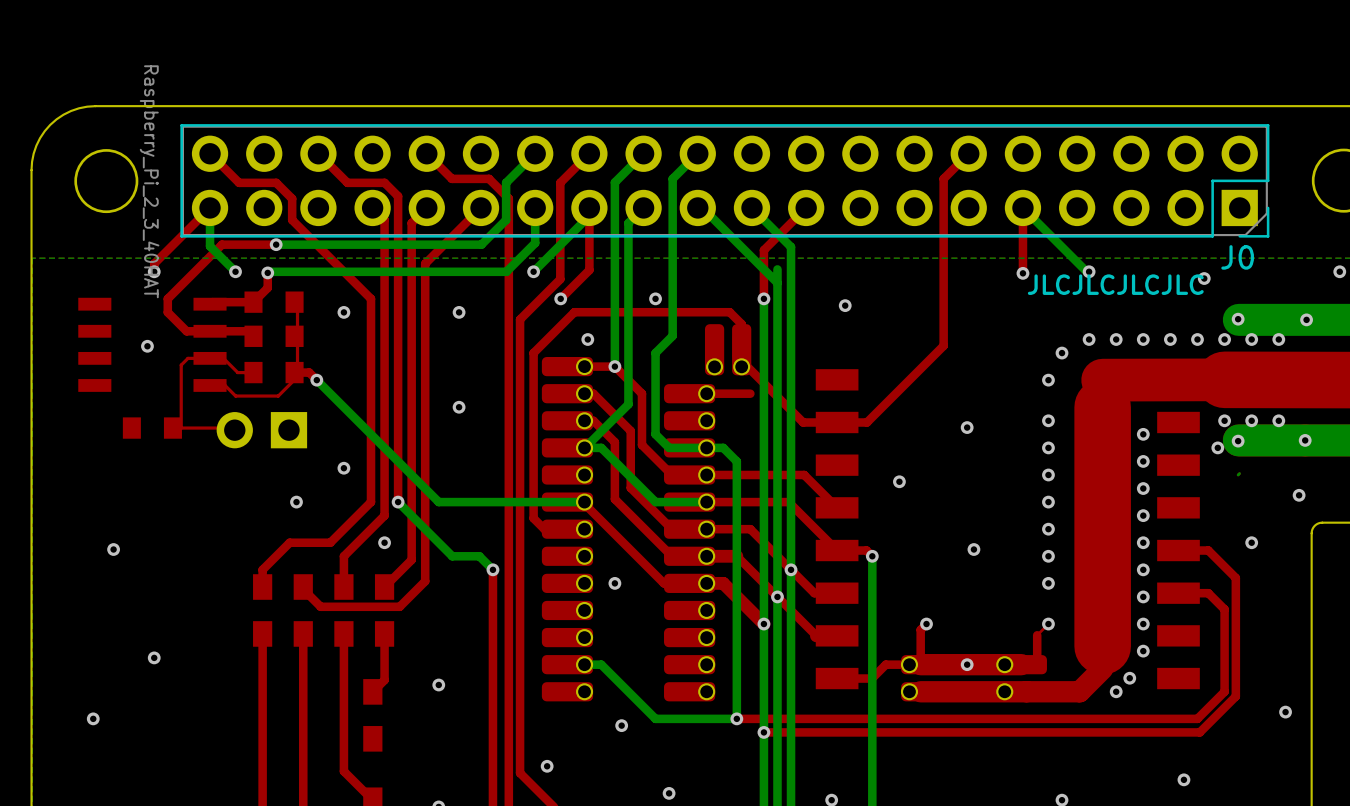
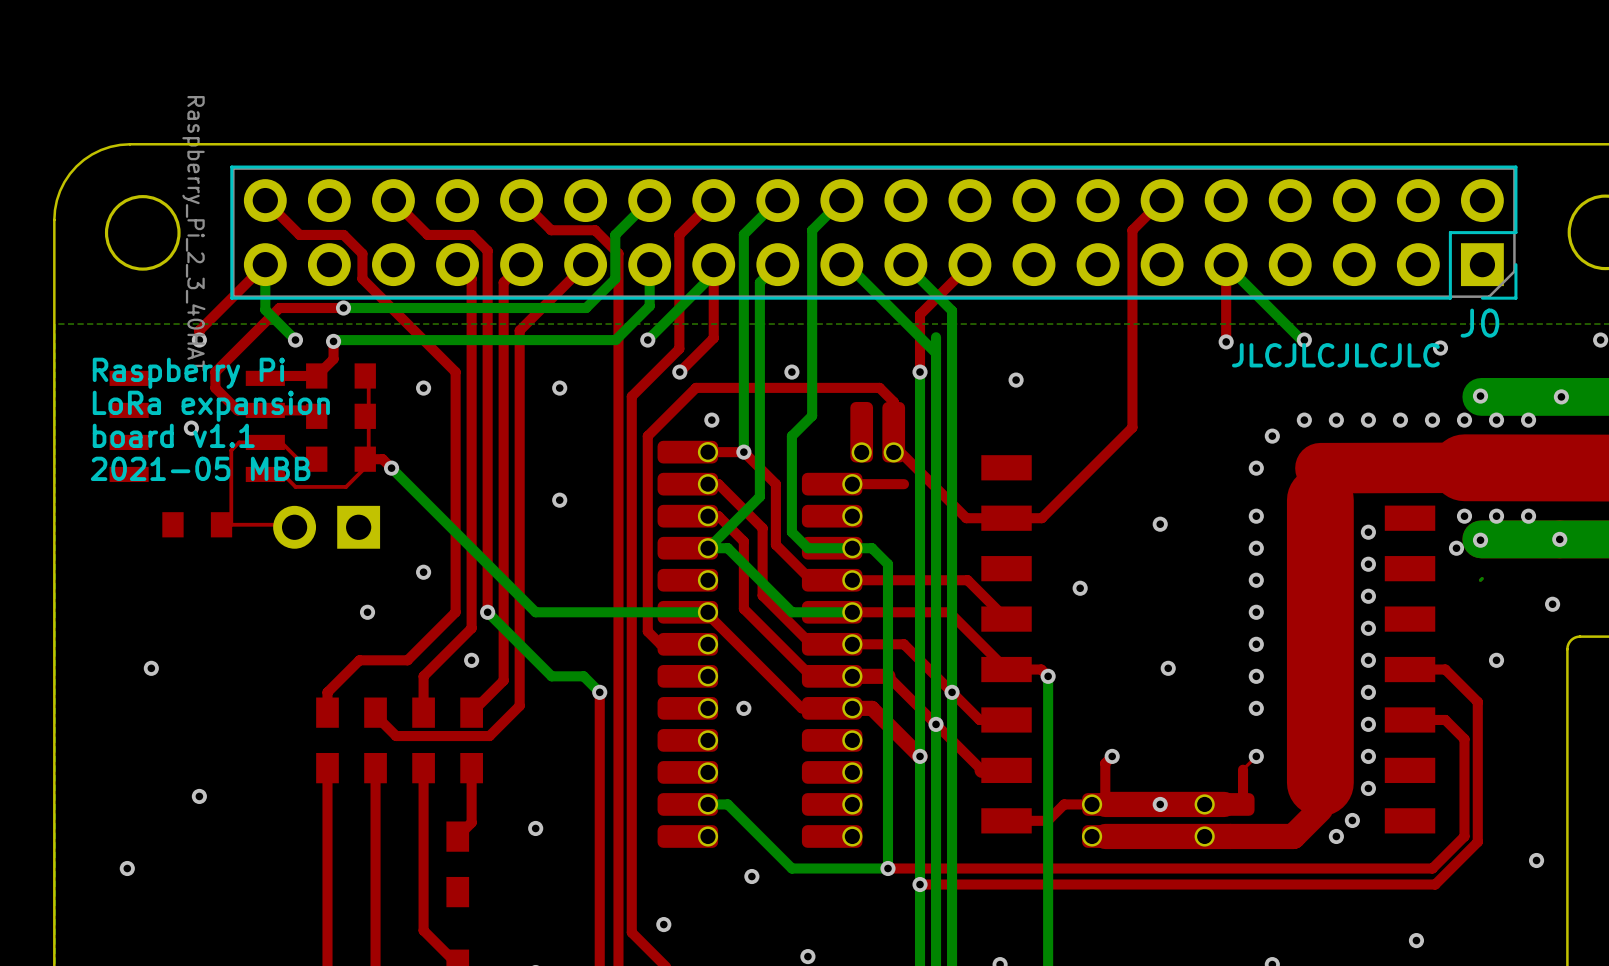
text: none -> Raspberry Pi (188, 373)
text: none -> LoRa expansion (211, 406)
text: none -> board v1.1 (173, 435)
text: none -> 2021-05 MBB (200, 468)

